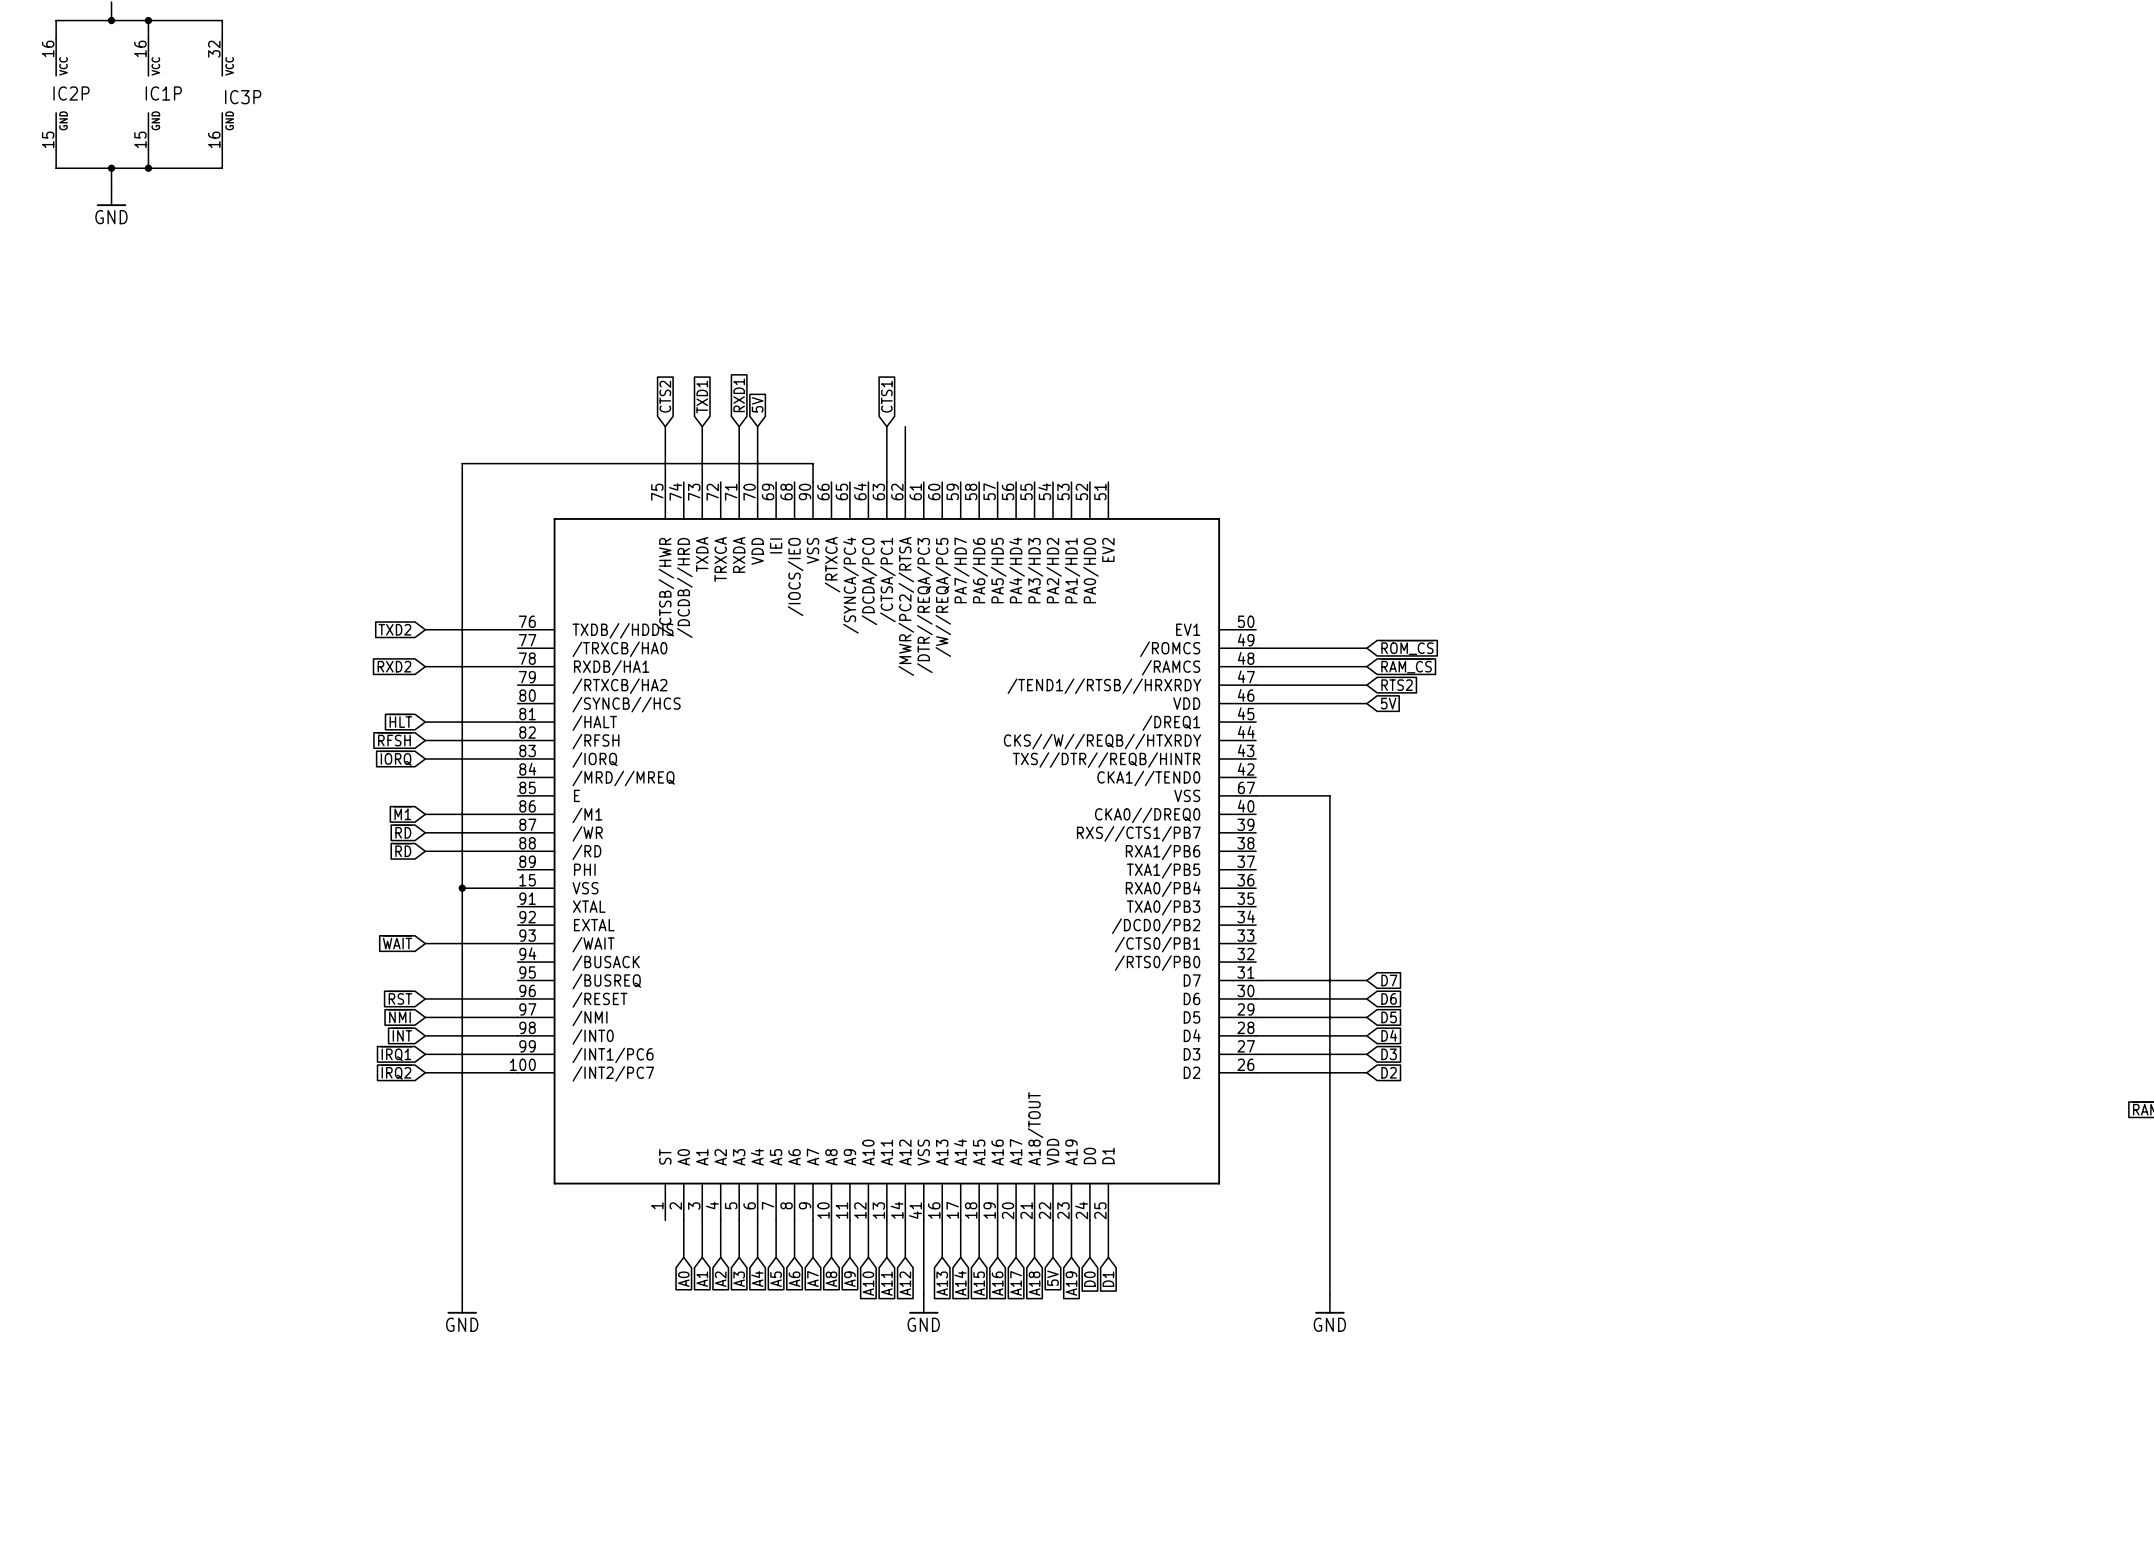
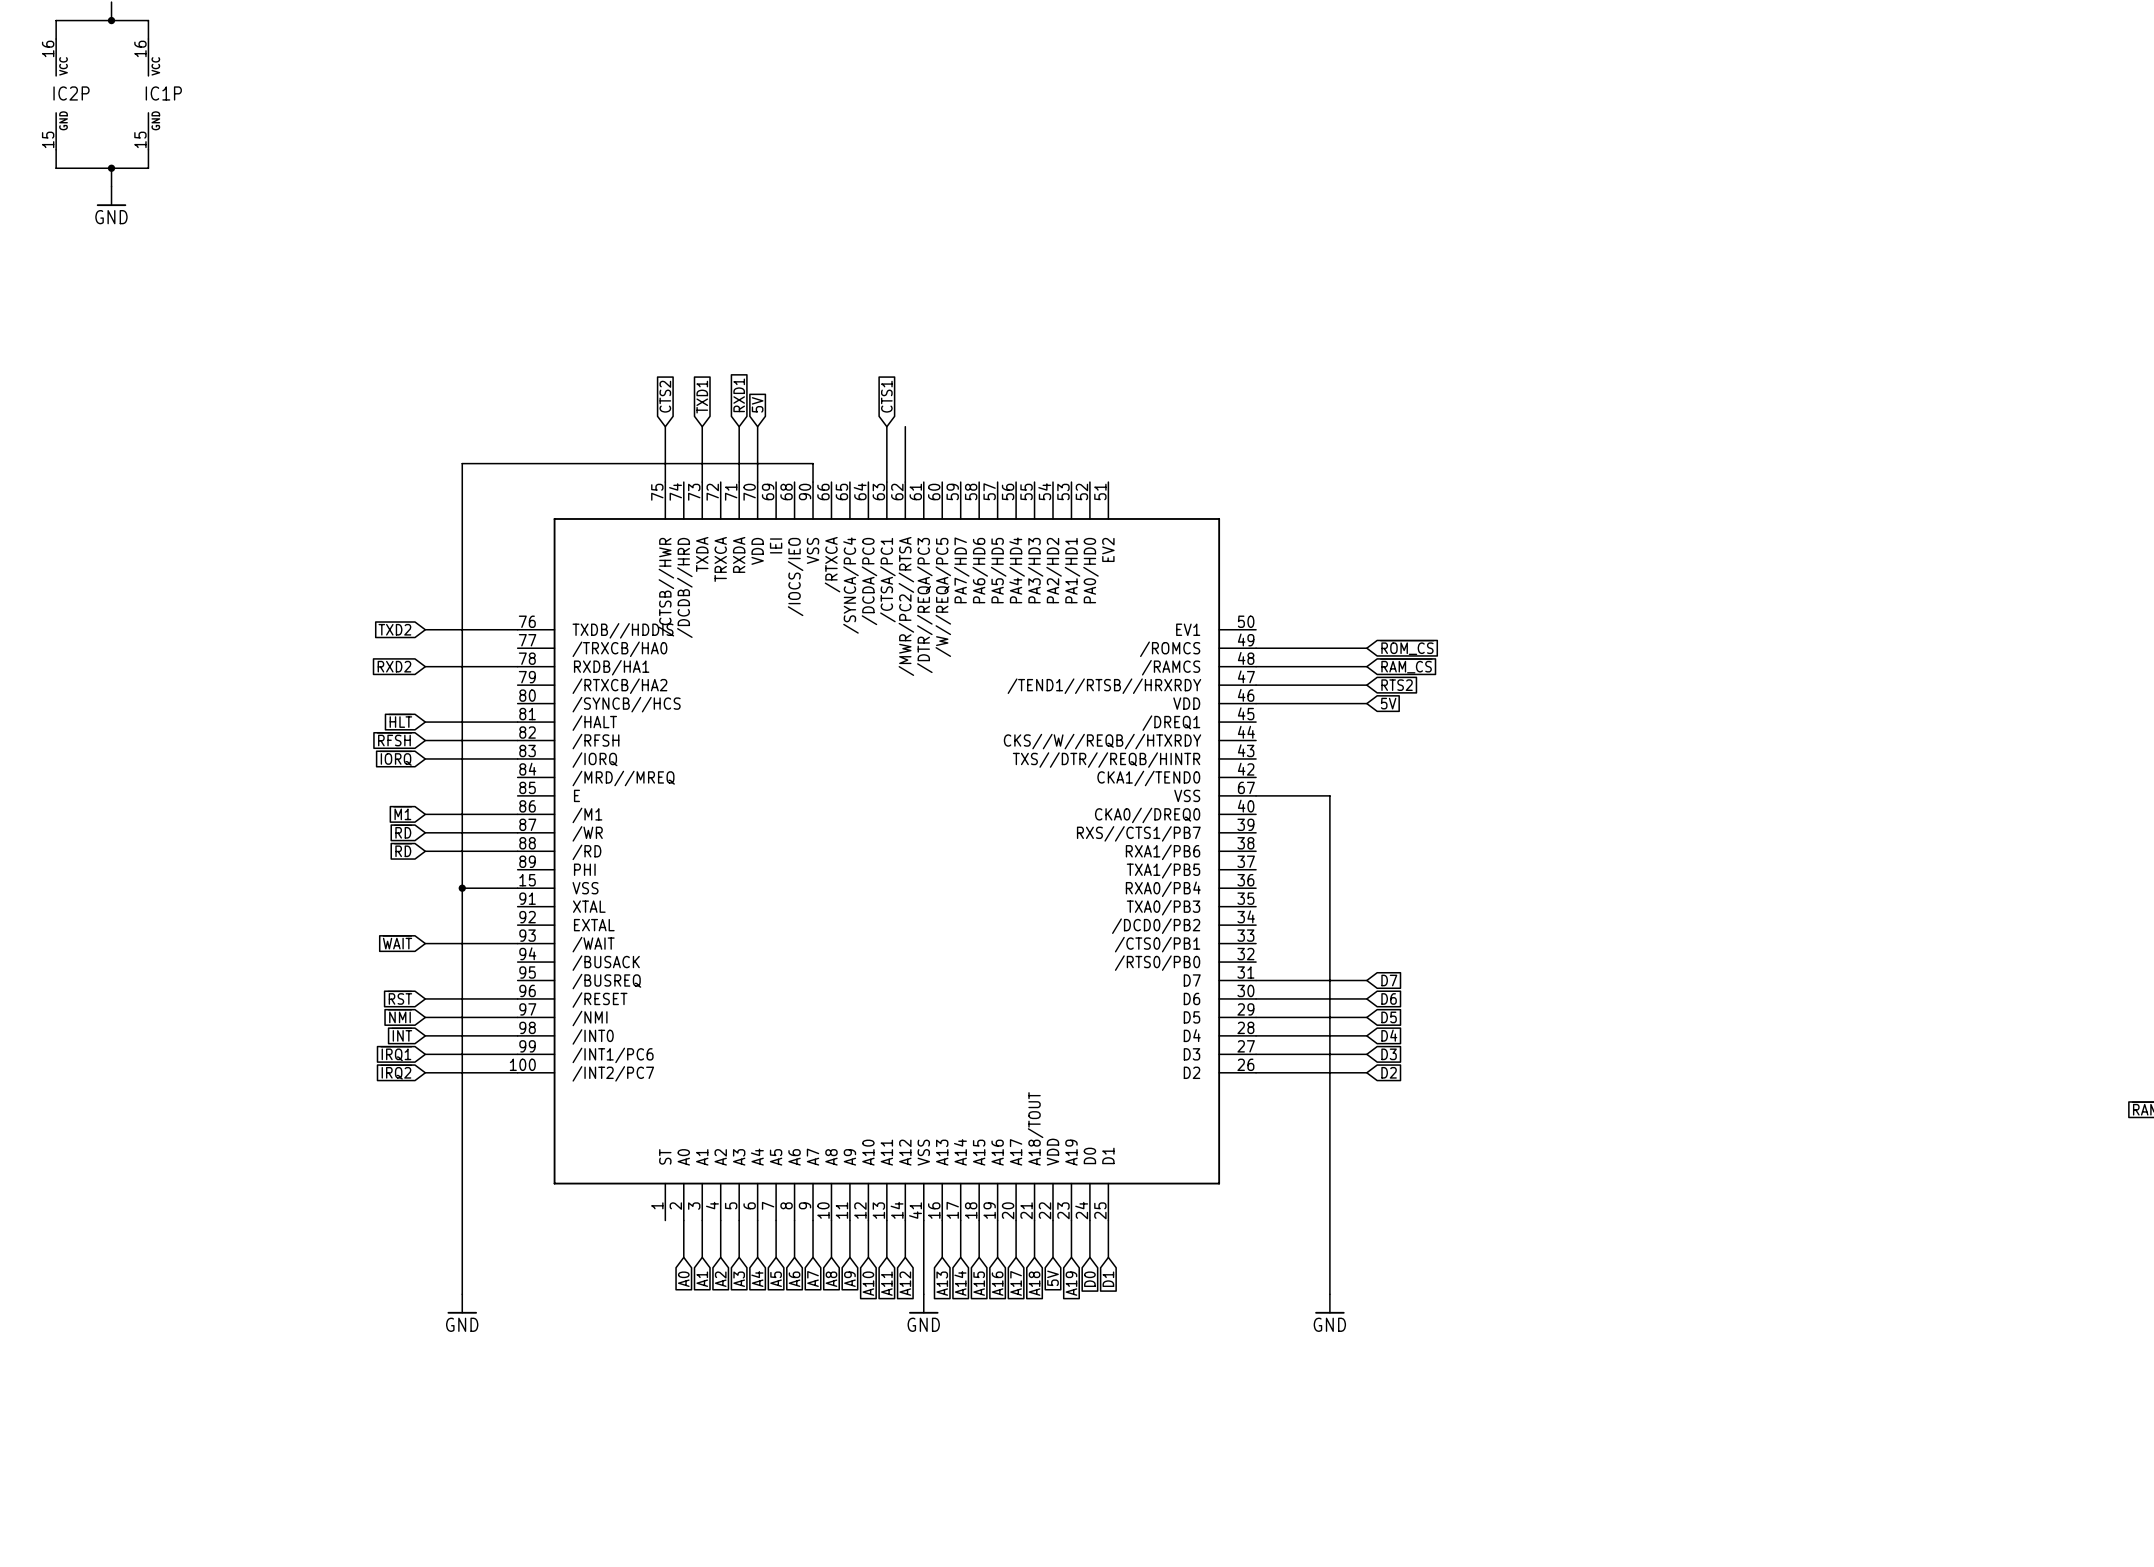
wire: (148, 20) (222, 20) (222, 39) -> none
junction: (148, 20) -> none
IC3P: (222, 94) -> none
wire: (222, 149) (222, 168) (148, 168) -> none
junction: (148, 168) -> none

